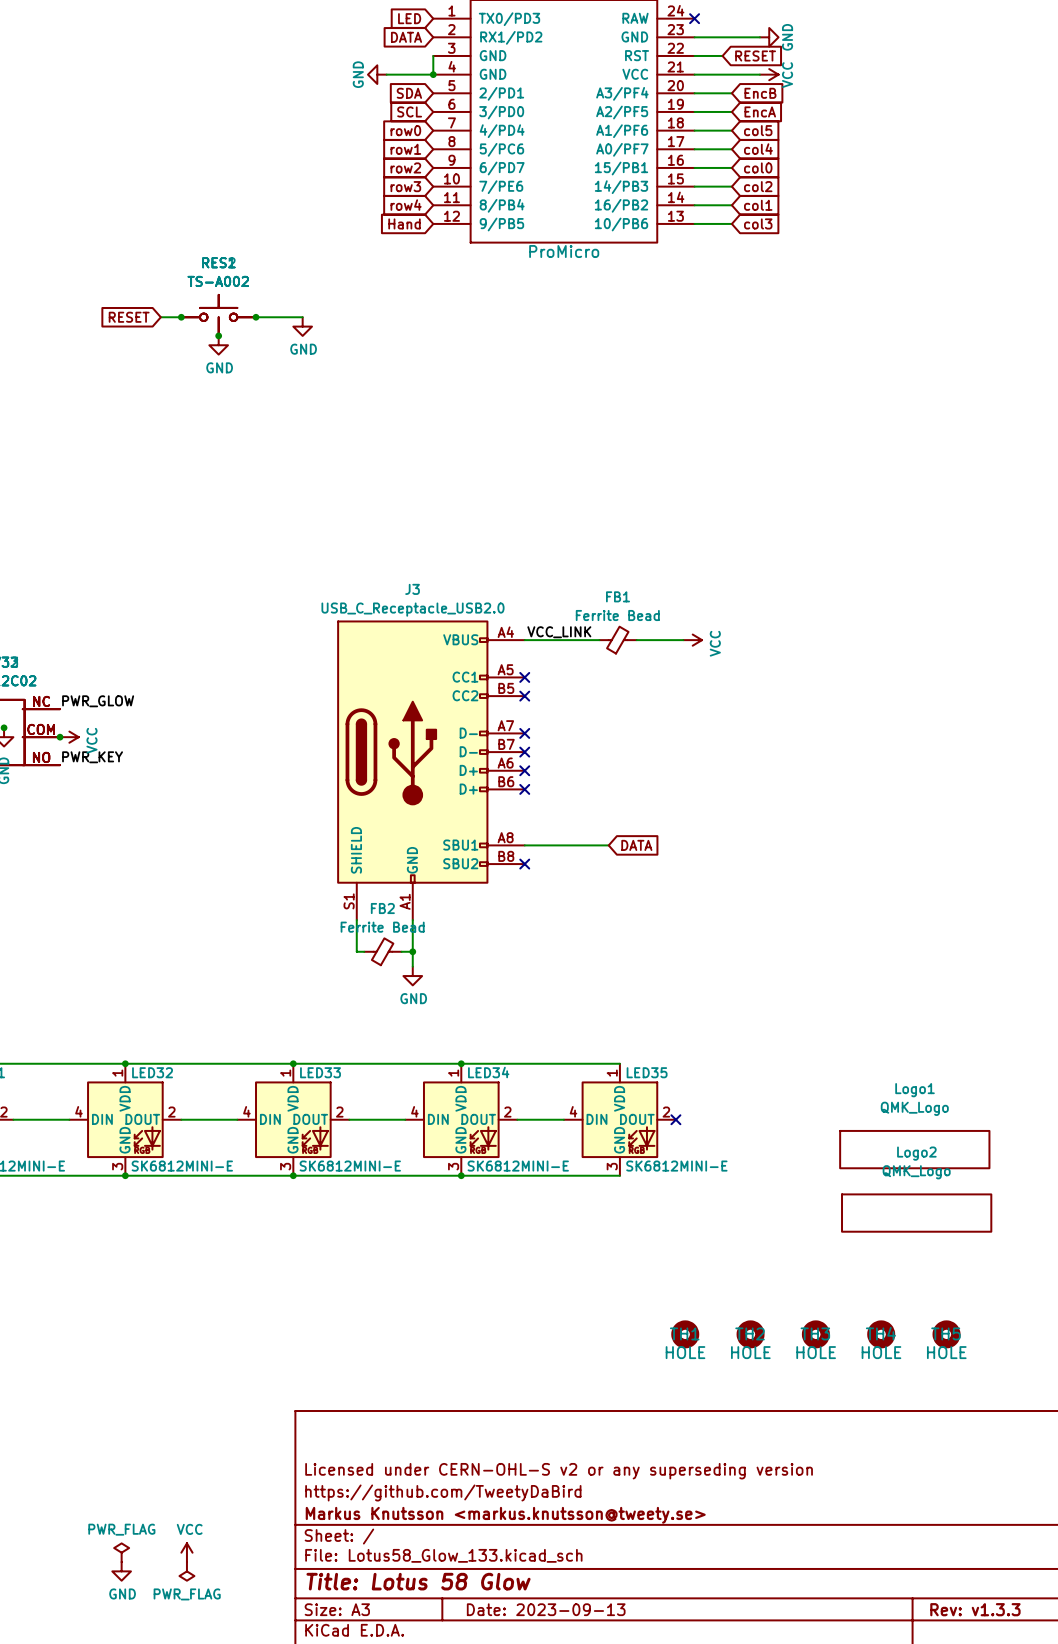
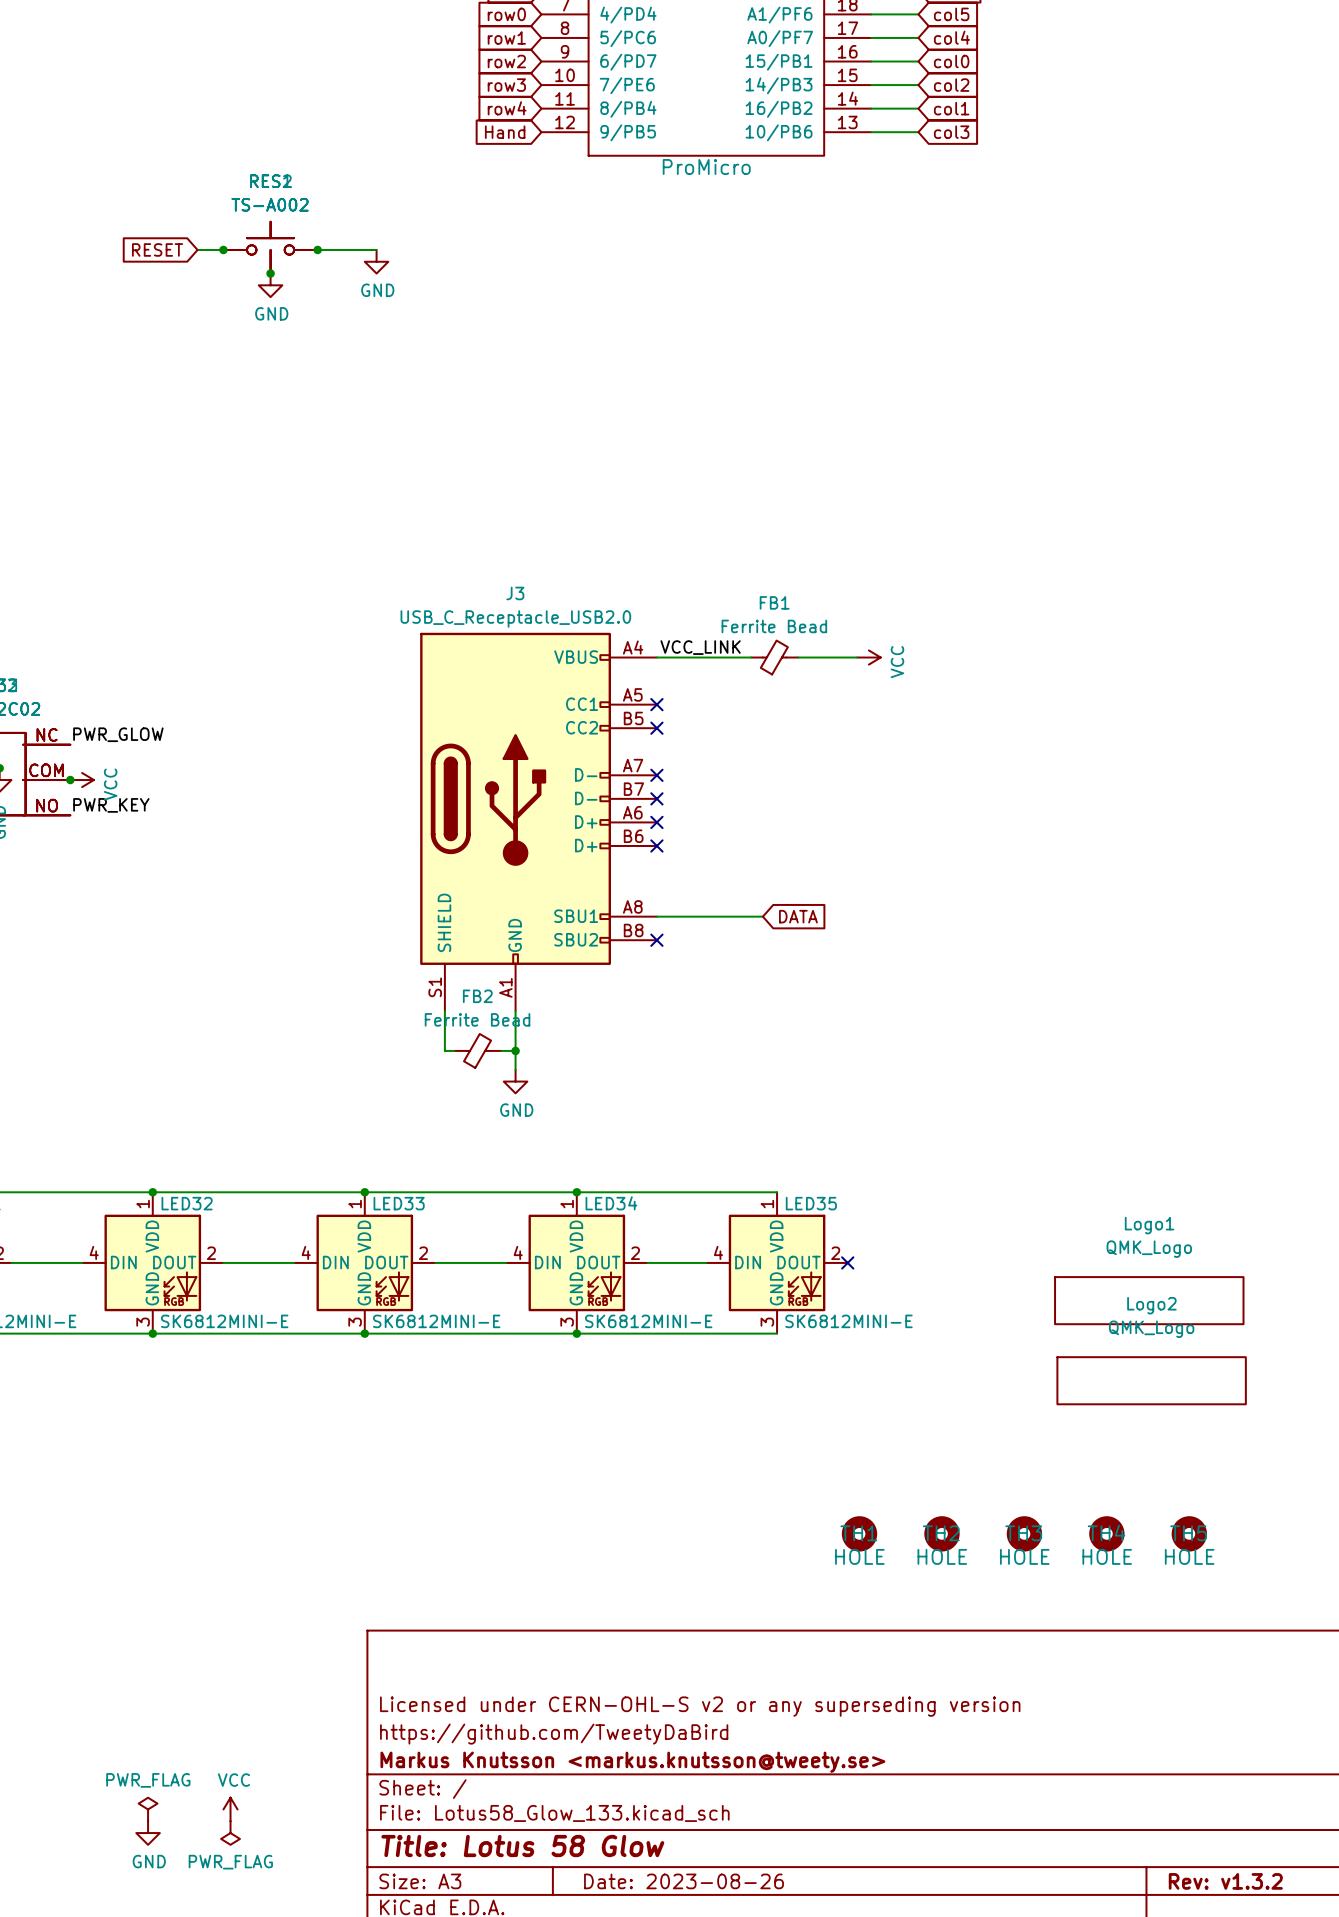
title block: Date: 2023-09-13 (546, 1609) -> Date: 2023-08-26 (684, 1881)
title block: Rev: v1.3.3 (975, 1609) -> Rev: v1.3.2 (1225, 1881)

